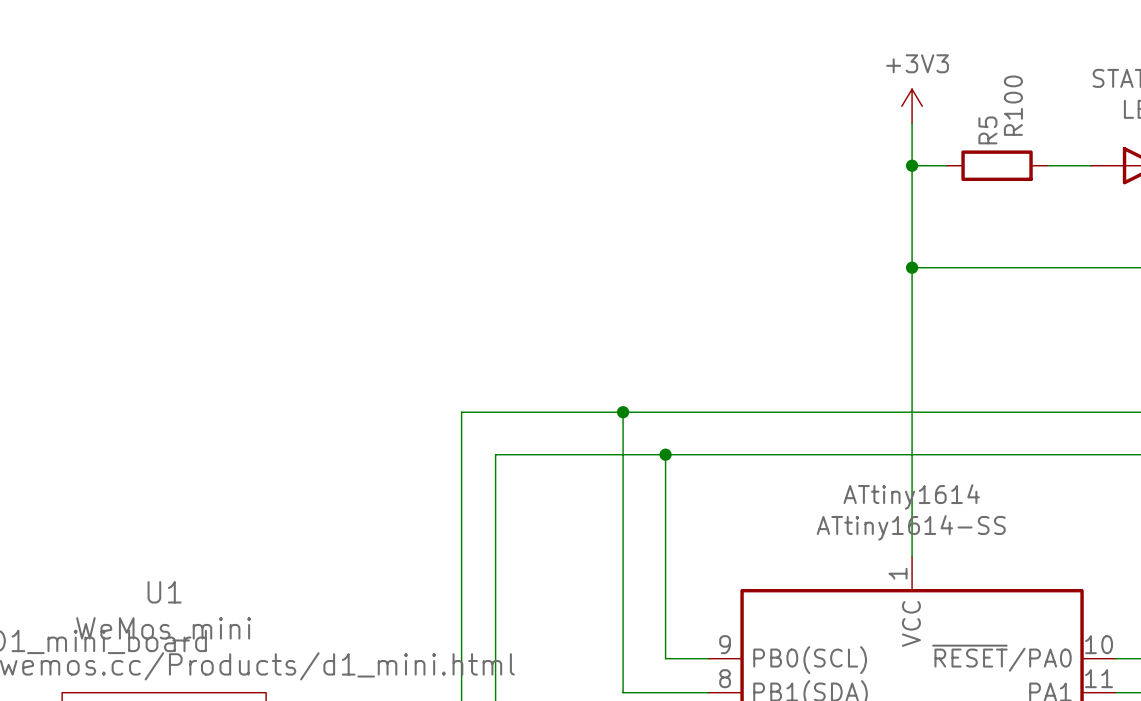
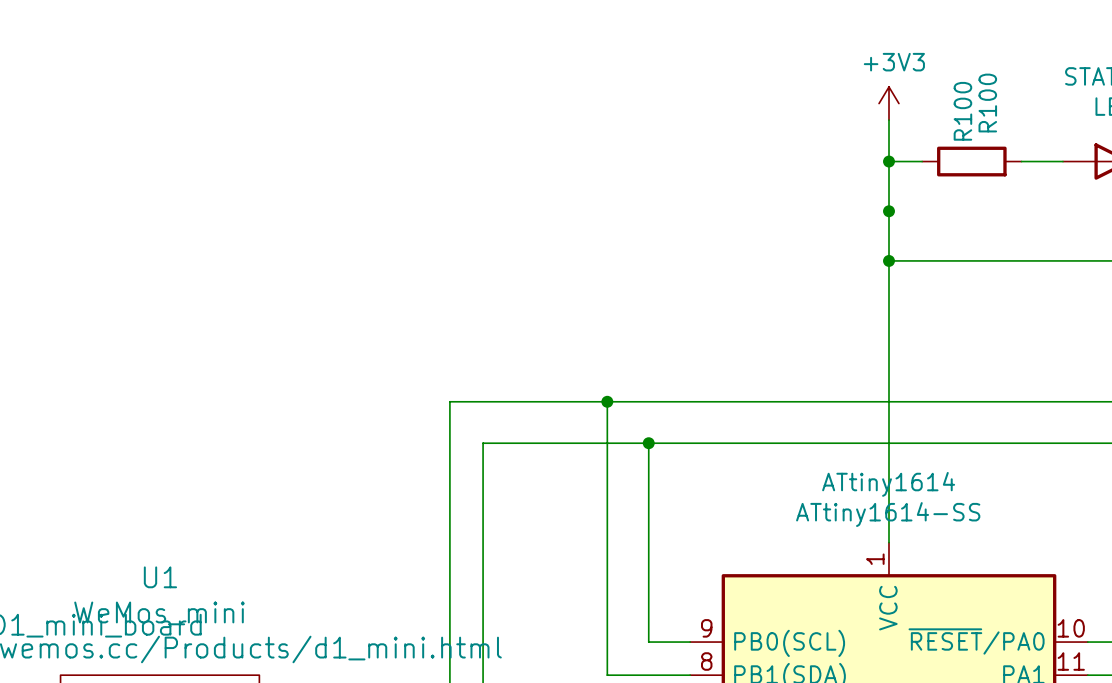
R5 name: R5 (987, 130) -> R100 (962, 111)
junction: none -> (888, 211)

